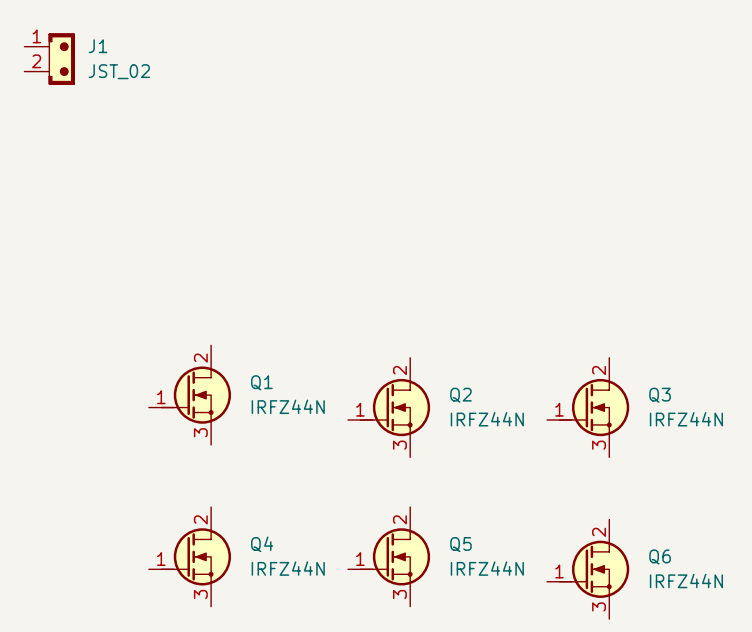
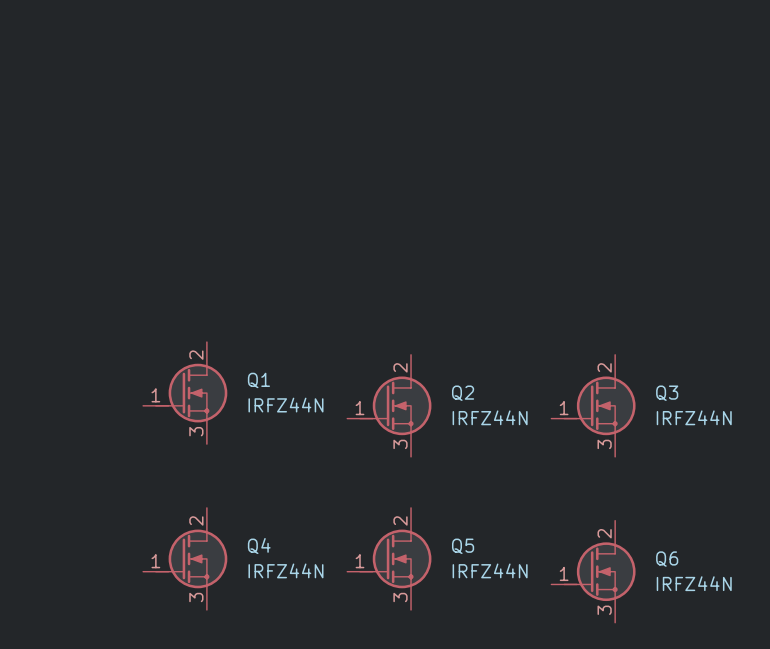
J1: JST_02 (49, 59) -> none

